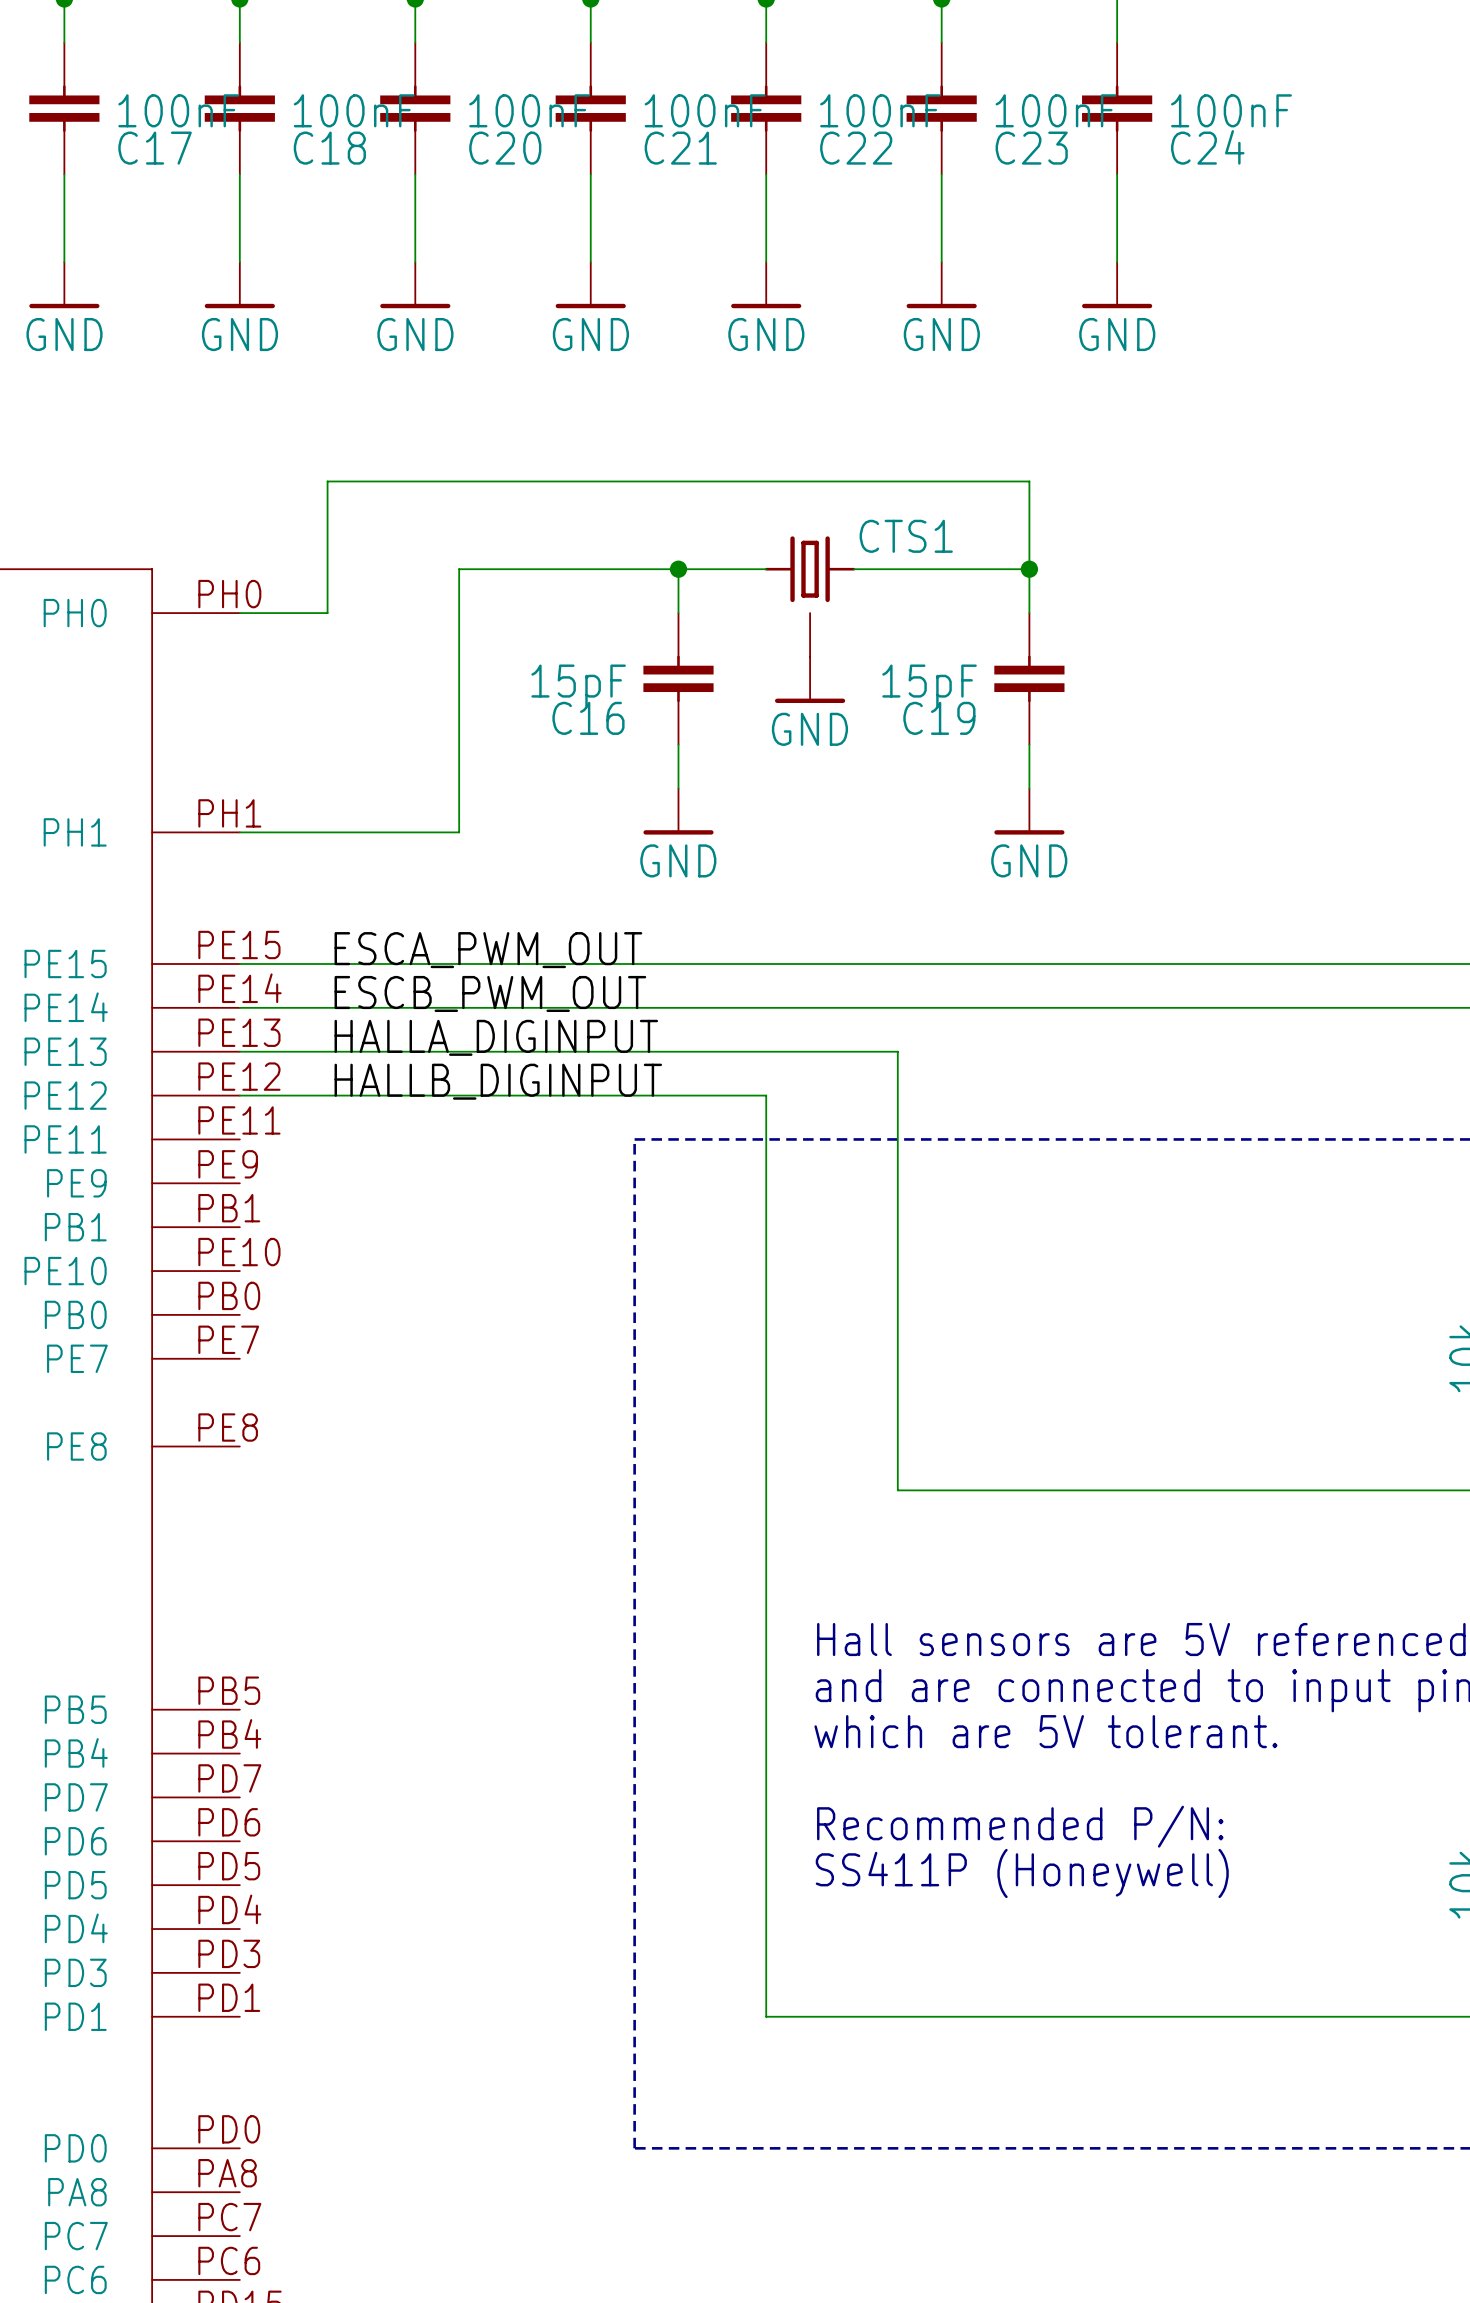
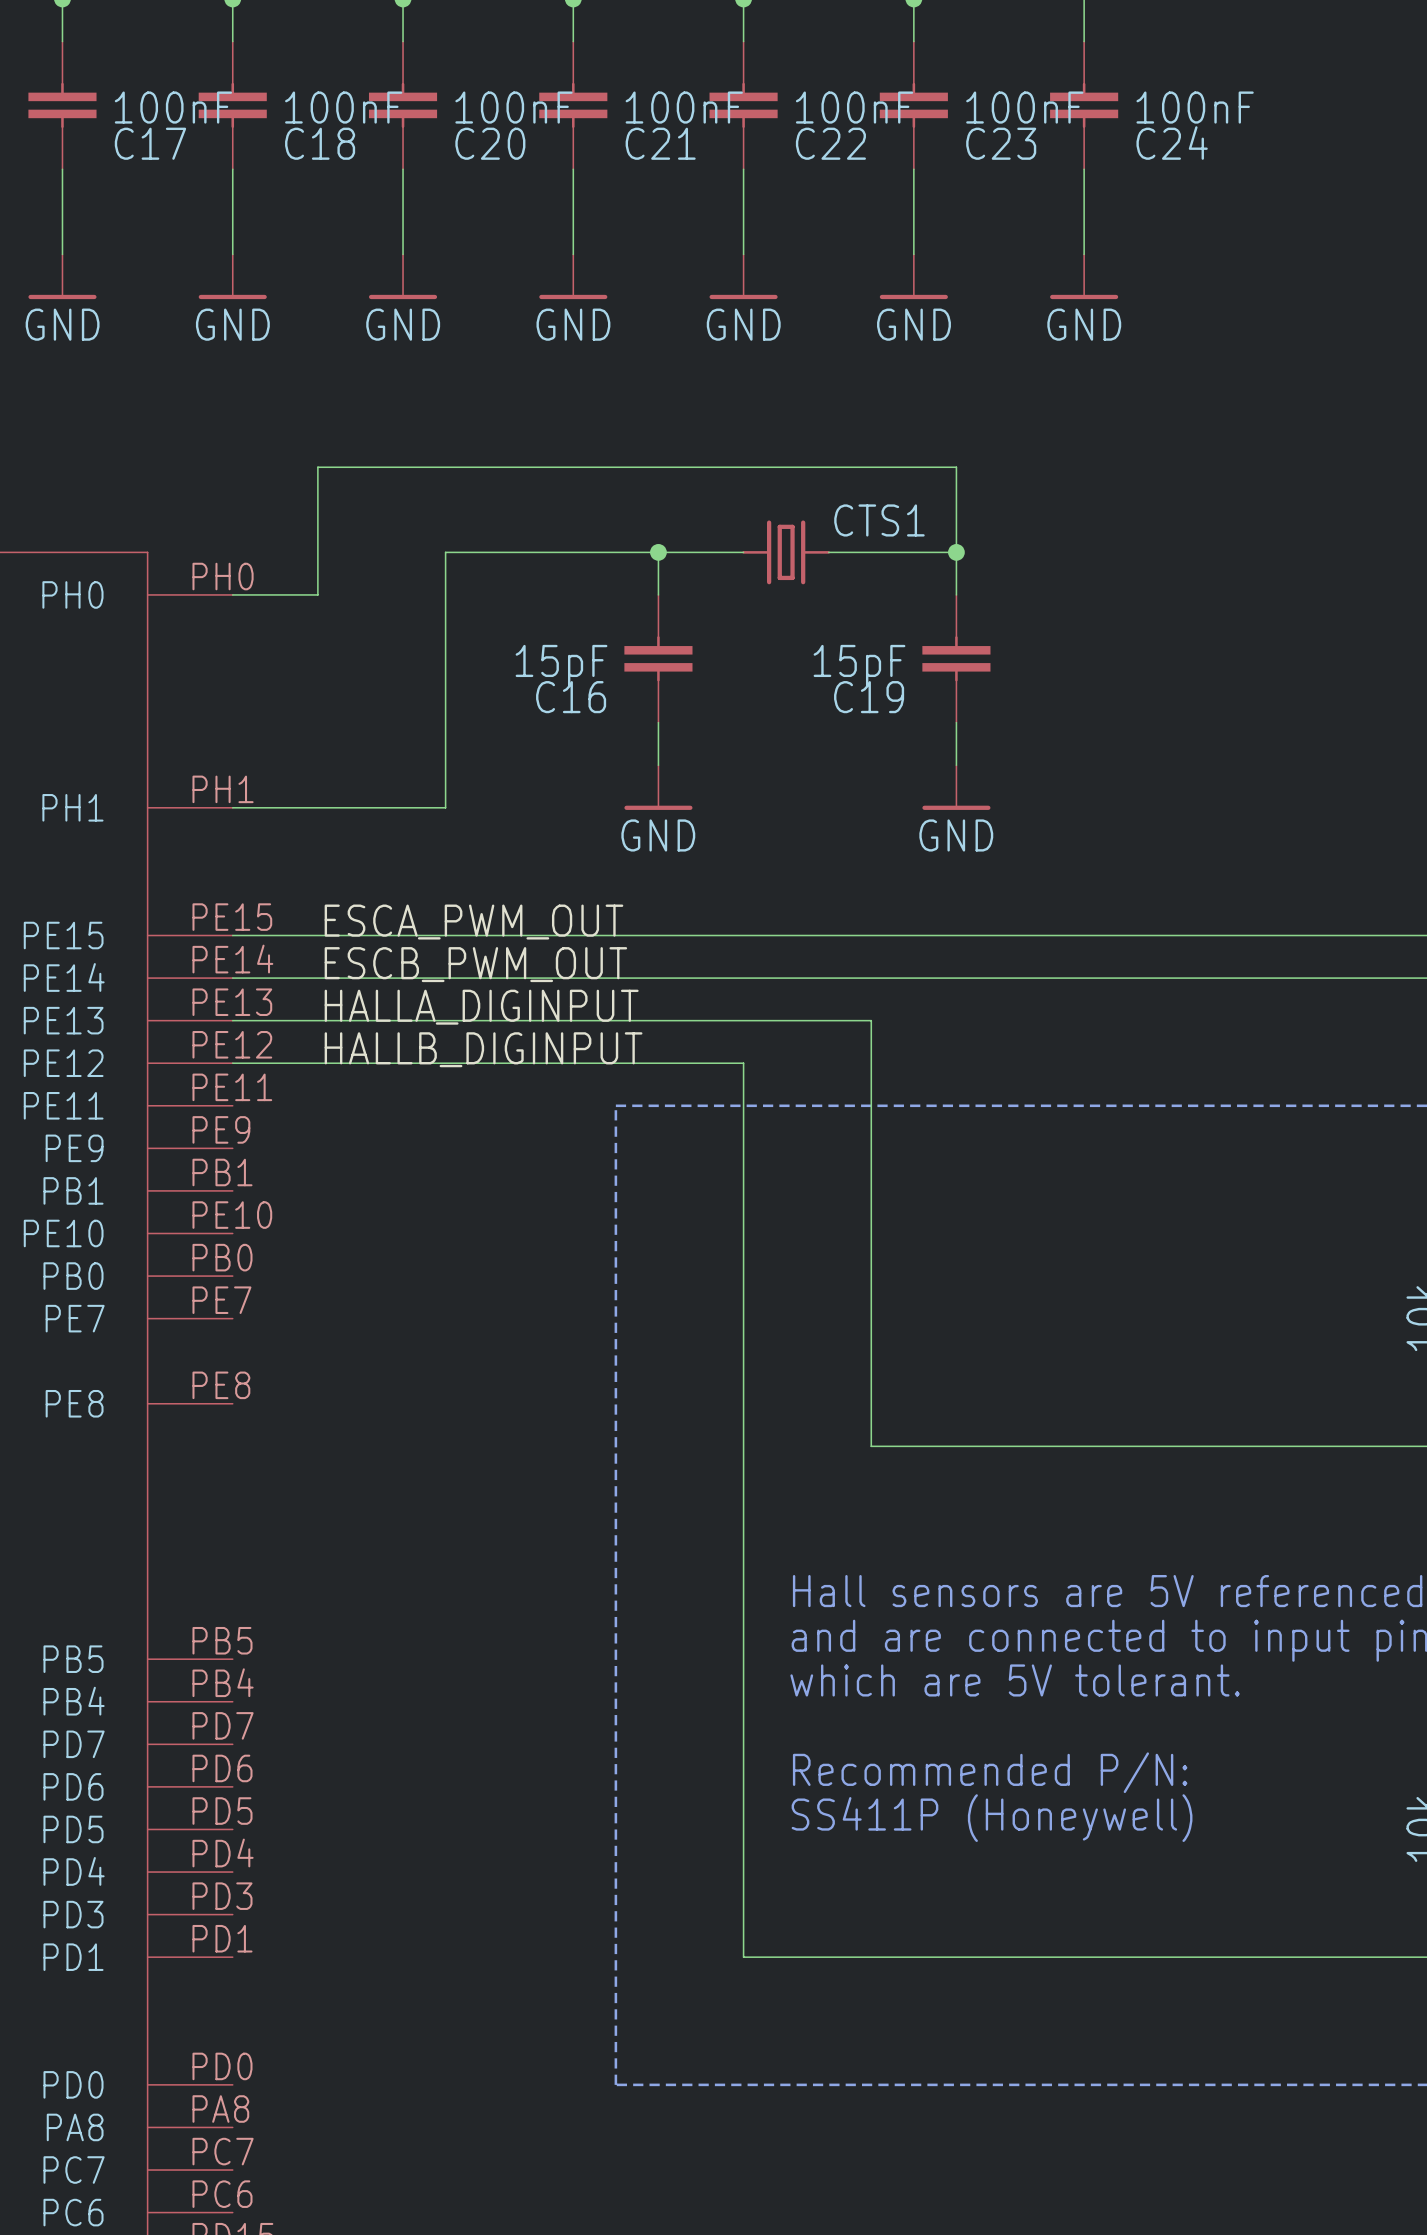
wire: (985, 481) (1029, 481) (1029, 613) -> (956, 467) (956, 594)
CTS1 symbol: [764, 536, 856, 657] -> [742, 520, 830, 585]
wire: (985, 569) (1029, 569) -> none
junction position: (1029, 569) -> (956, 552)
C19 position: (1029, 678) -> (956, 658)
power symbol: GND (810, 679) -> none
wire: (1029, 744) (1029, 788) -> (956, 722) (956, 765)
power symbol position: GND (1029, 811) -> GND (956, 787)

